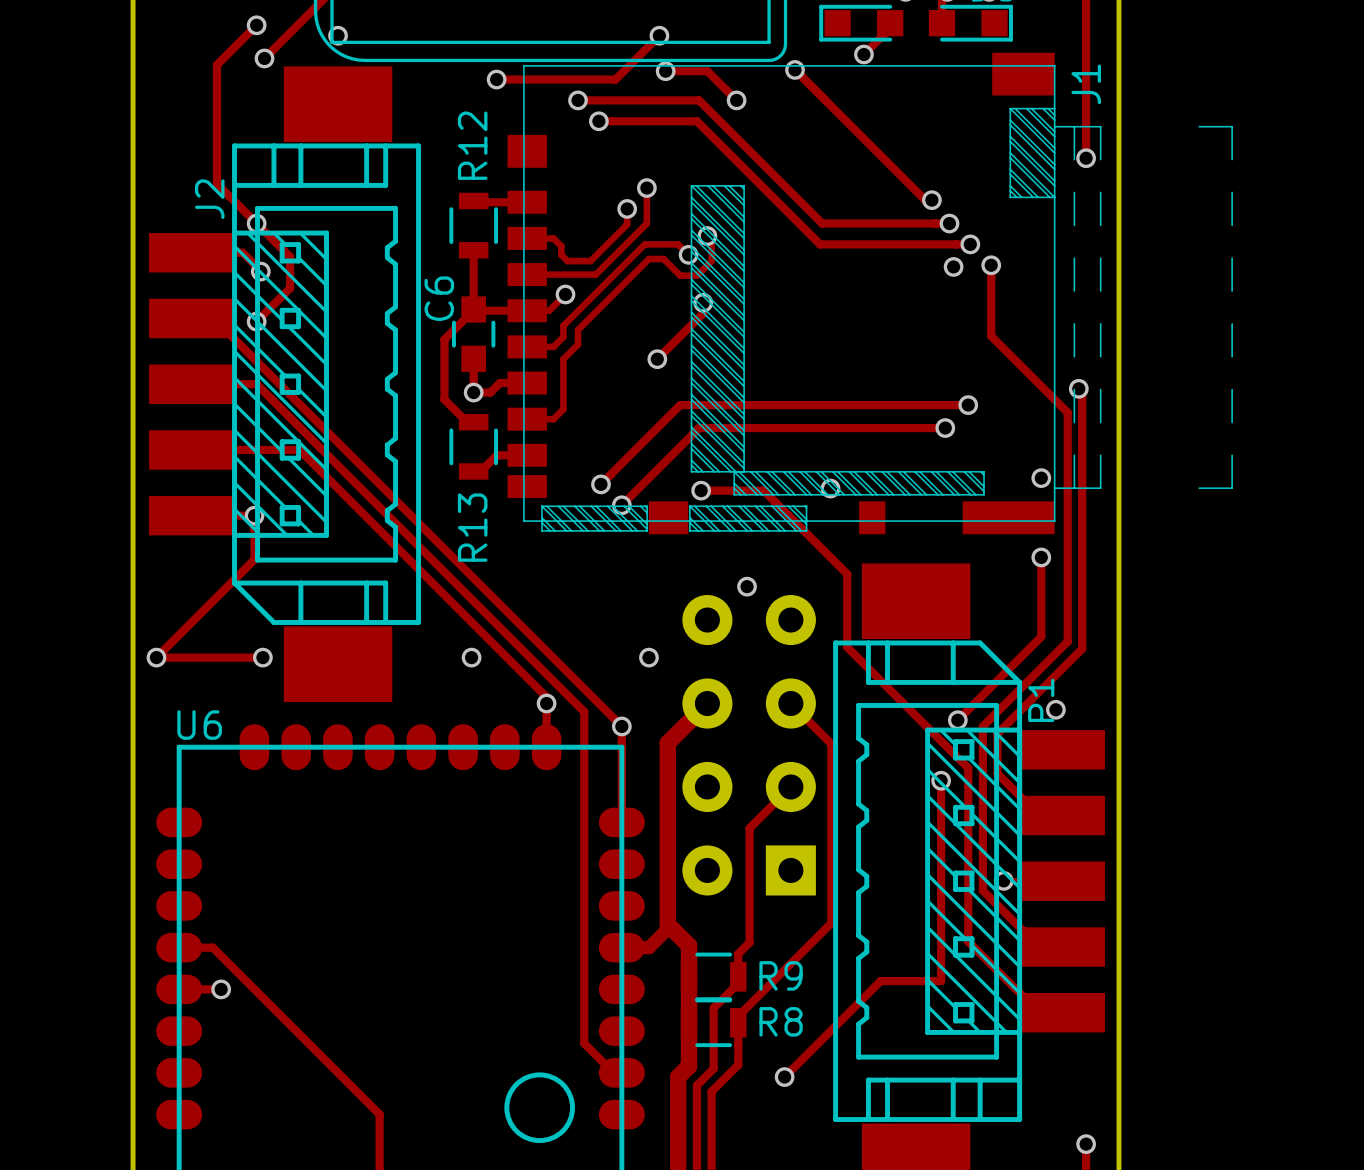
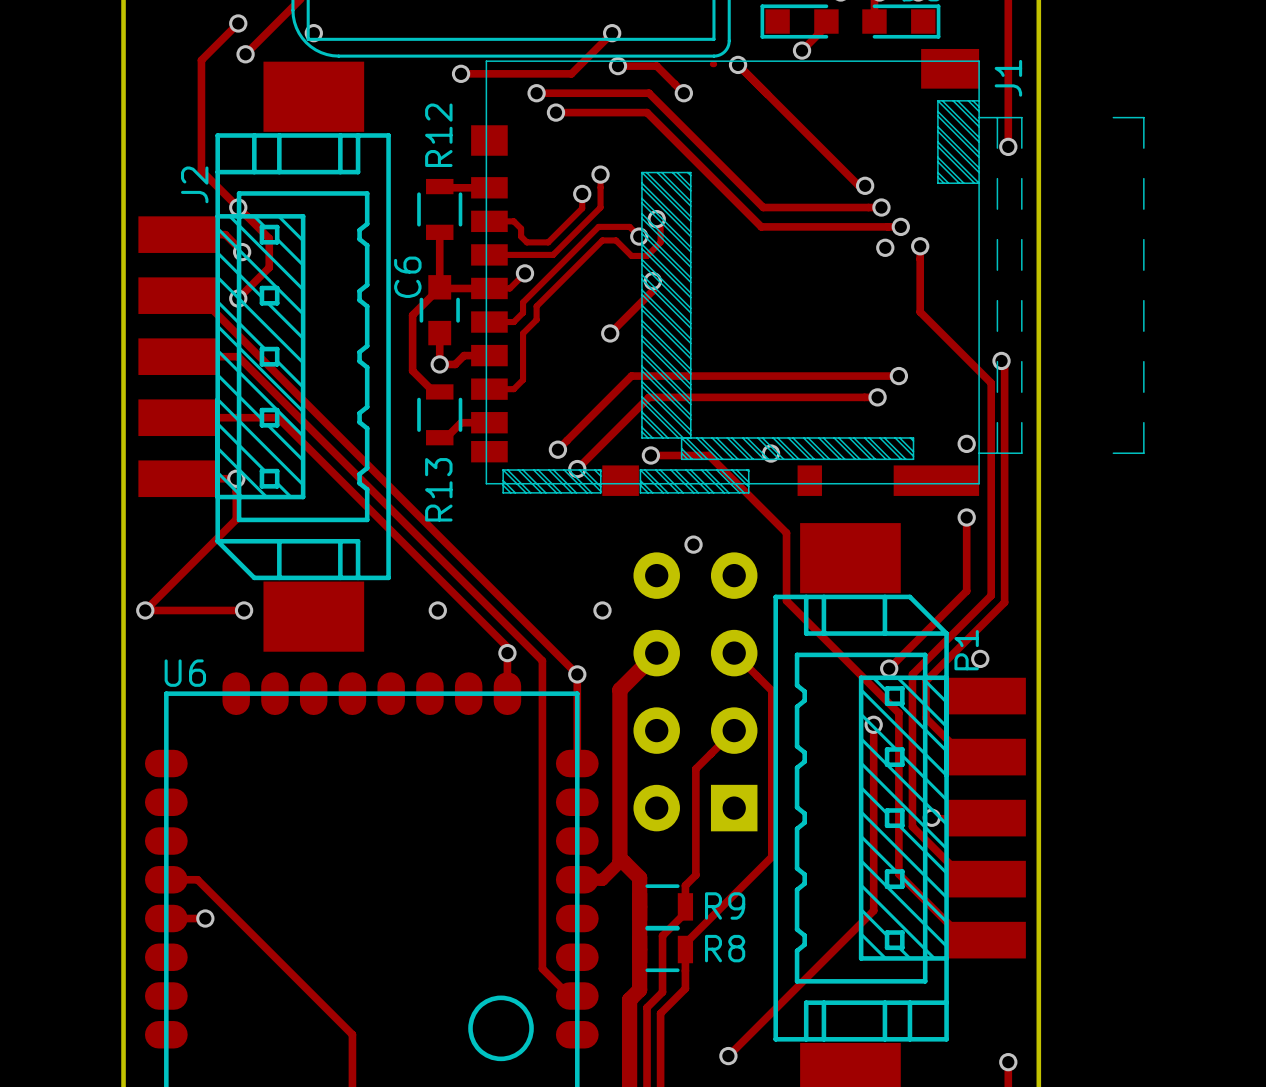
track: none -> (712, 64) (714, 64)
track: (941, 981) (880, 981) (784, 1077) -> (873, 910) (728, 1056)
via position: (784, 1077) -> (728, 1056)

